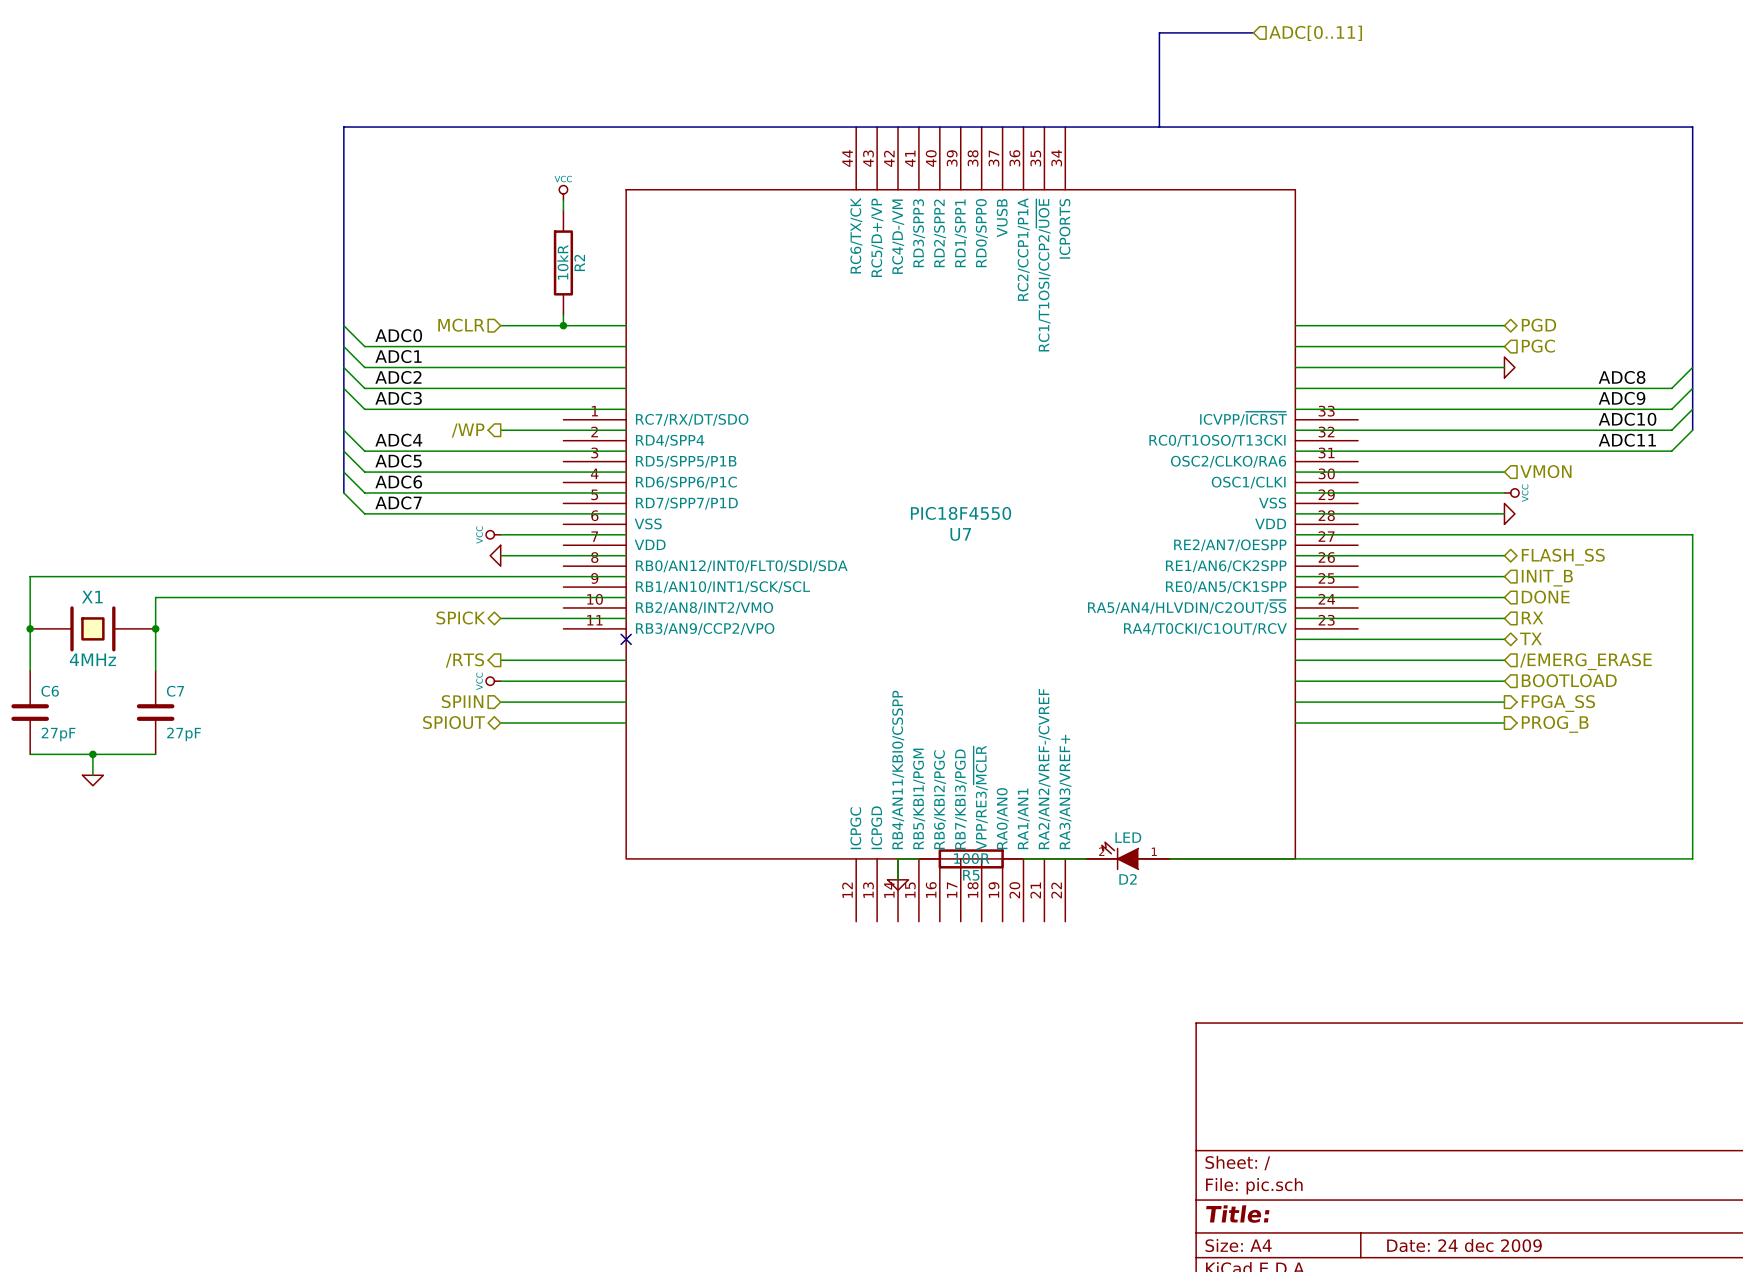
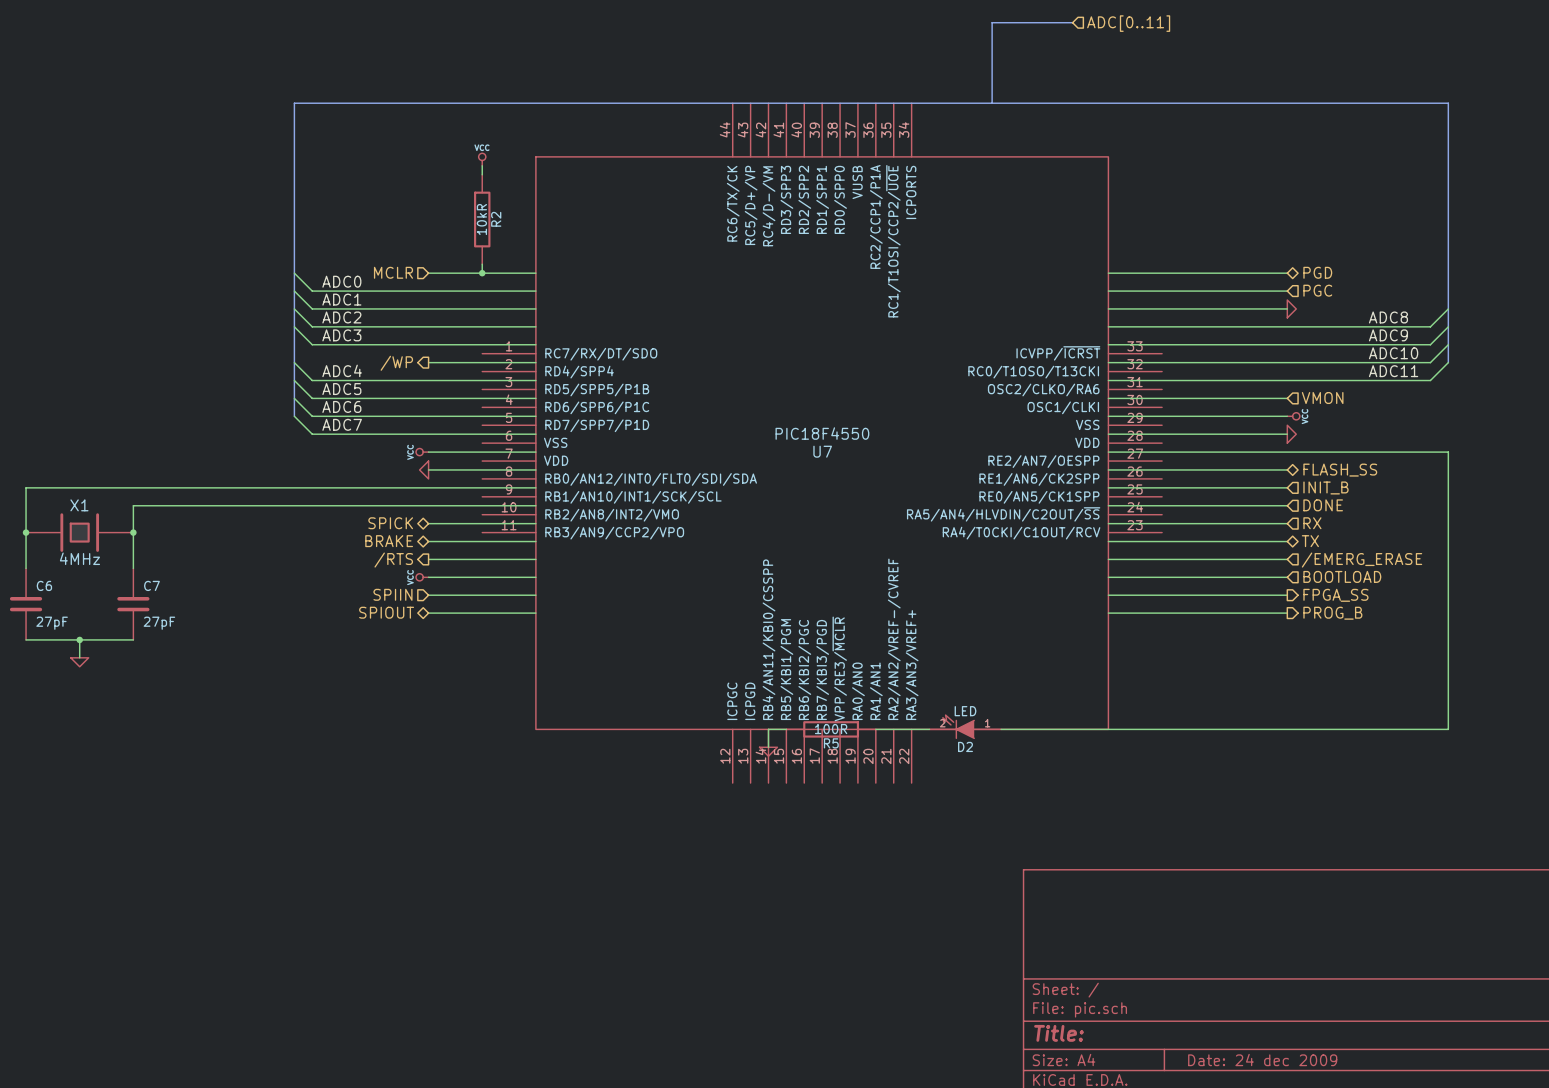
hierarchical label: none -> BRAKE (389, 541)
wire: none -> (428, 541) (535, 541)
no-connect mark: (626, 639) -> none

